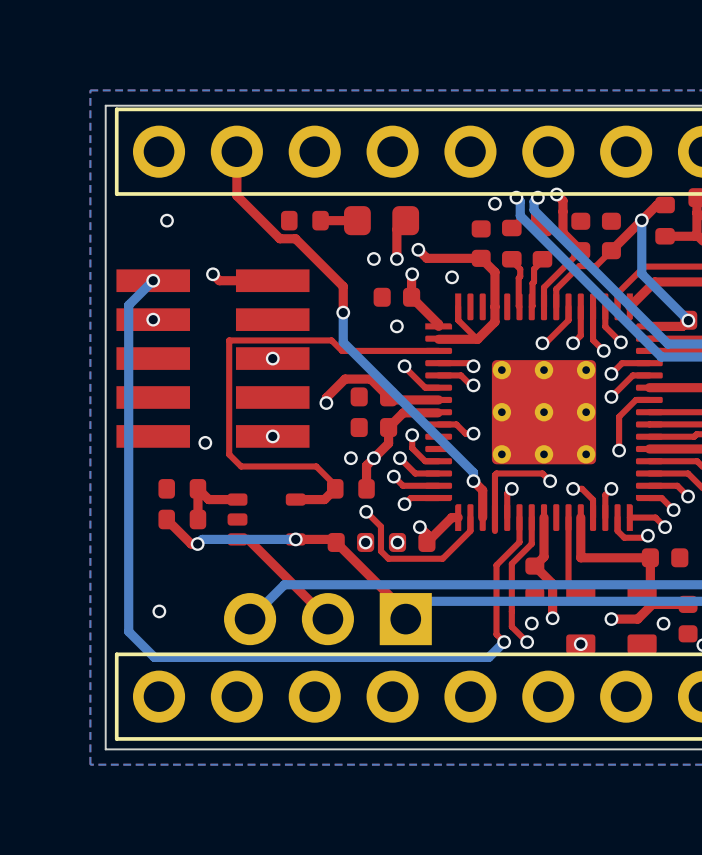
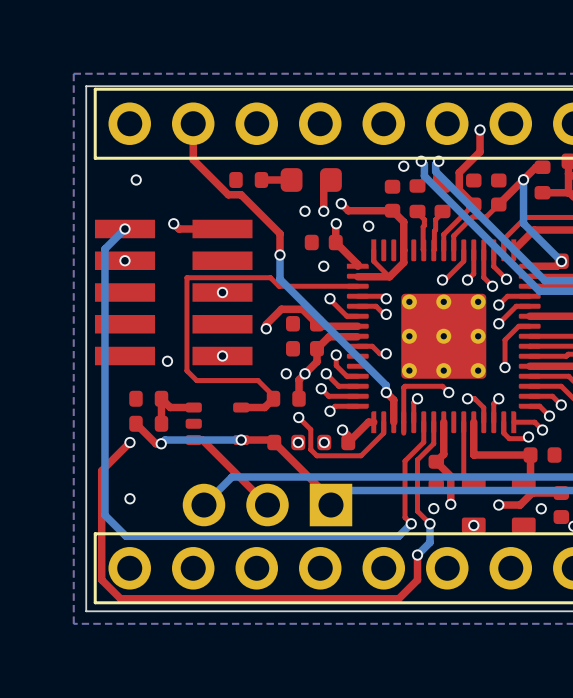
top track: (556, 194) (562, 200) (562, 211) -> (480, 129) (480, 151) (459, 172)
via position: (556, 194) -> (480, 129)
top track: none -> (129, 442) (101, 470) (101, 579) (120, 598) (398, 598) (417, 580) (417, 555)
via: none -> (129, 442)
bottom track: none -> (430, 523) (430, 542) (417, 555)
via: none -> (417, 555)

